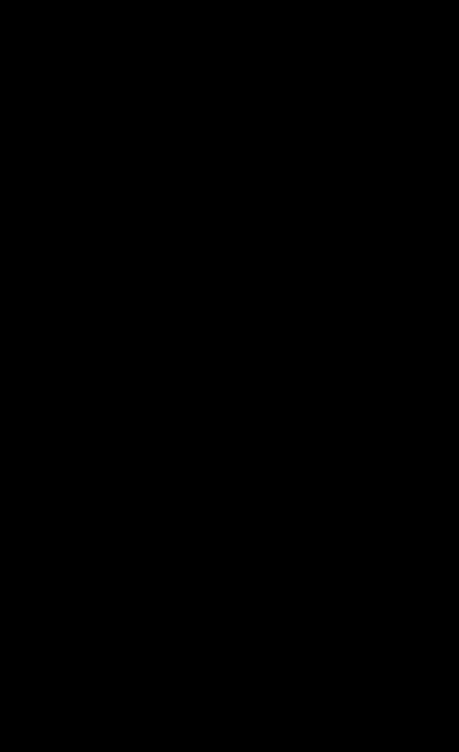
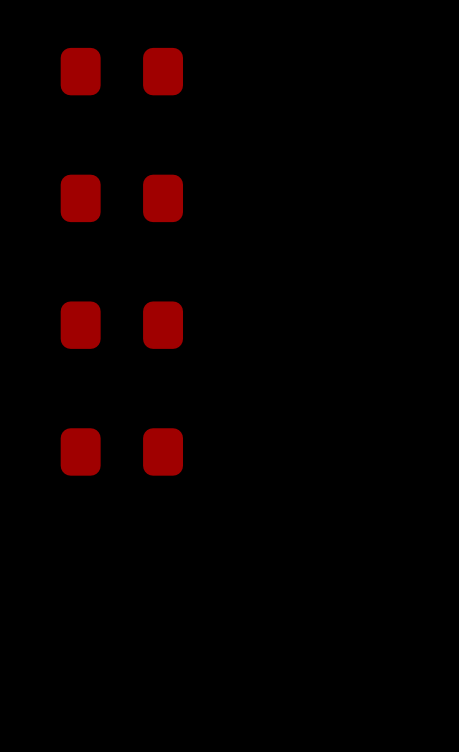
part: none -> (121, 71)
part: none -> (121, 198)
part: none -> (121, 325)
part: none -> (121, 451)

